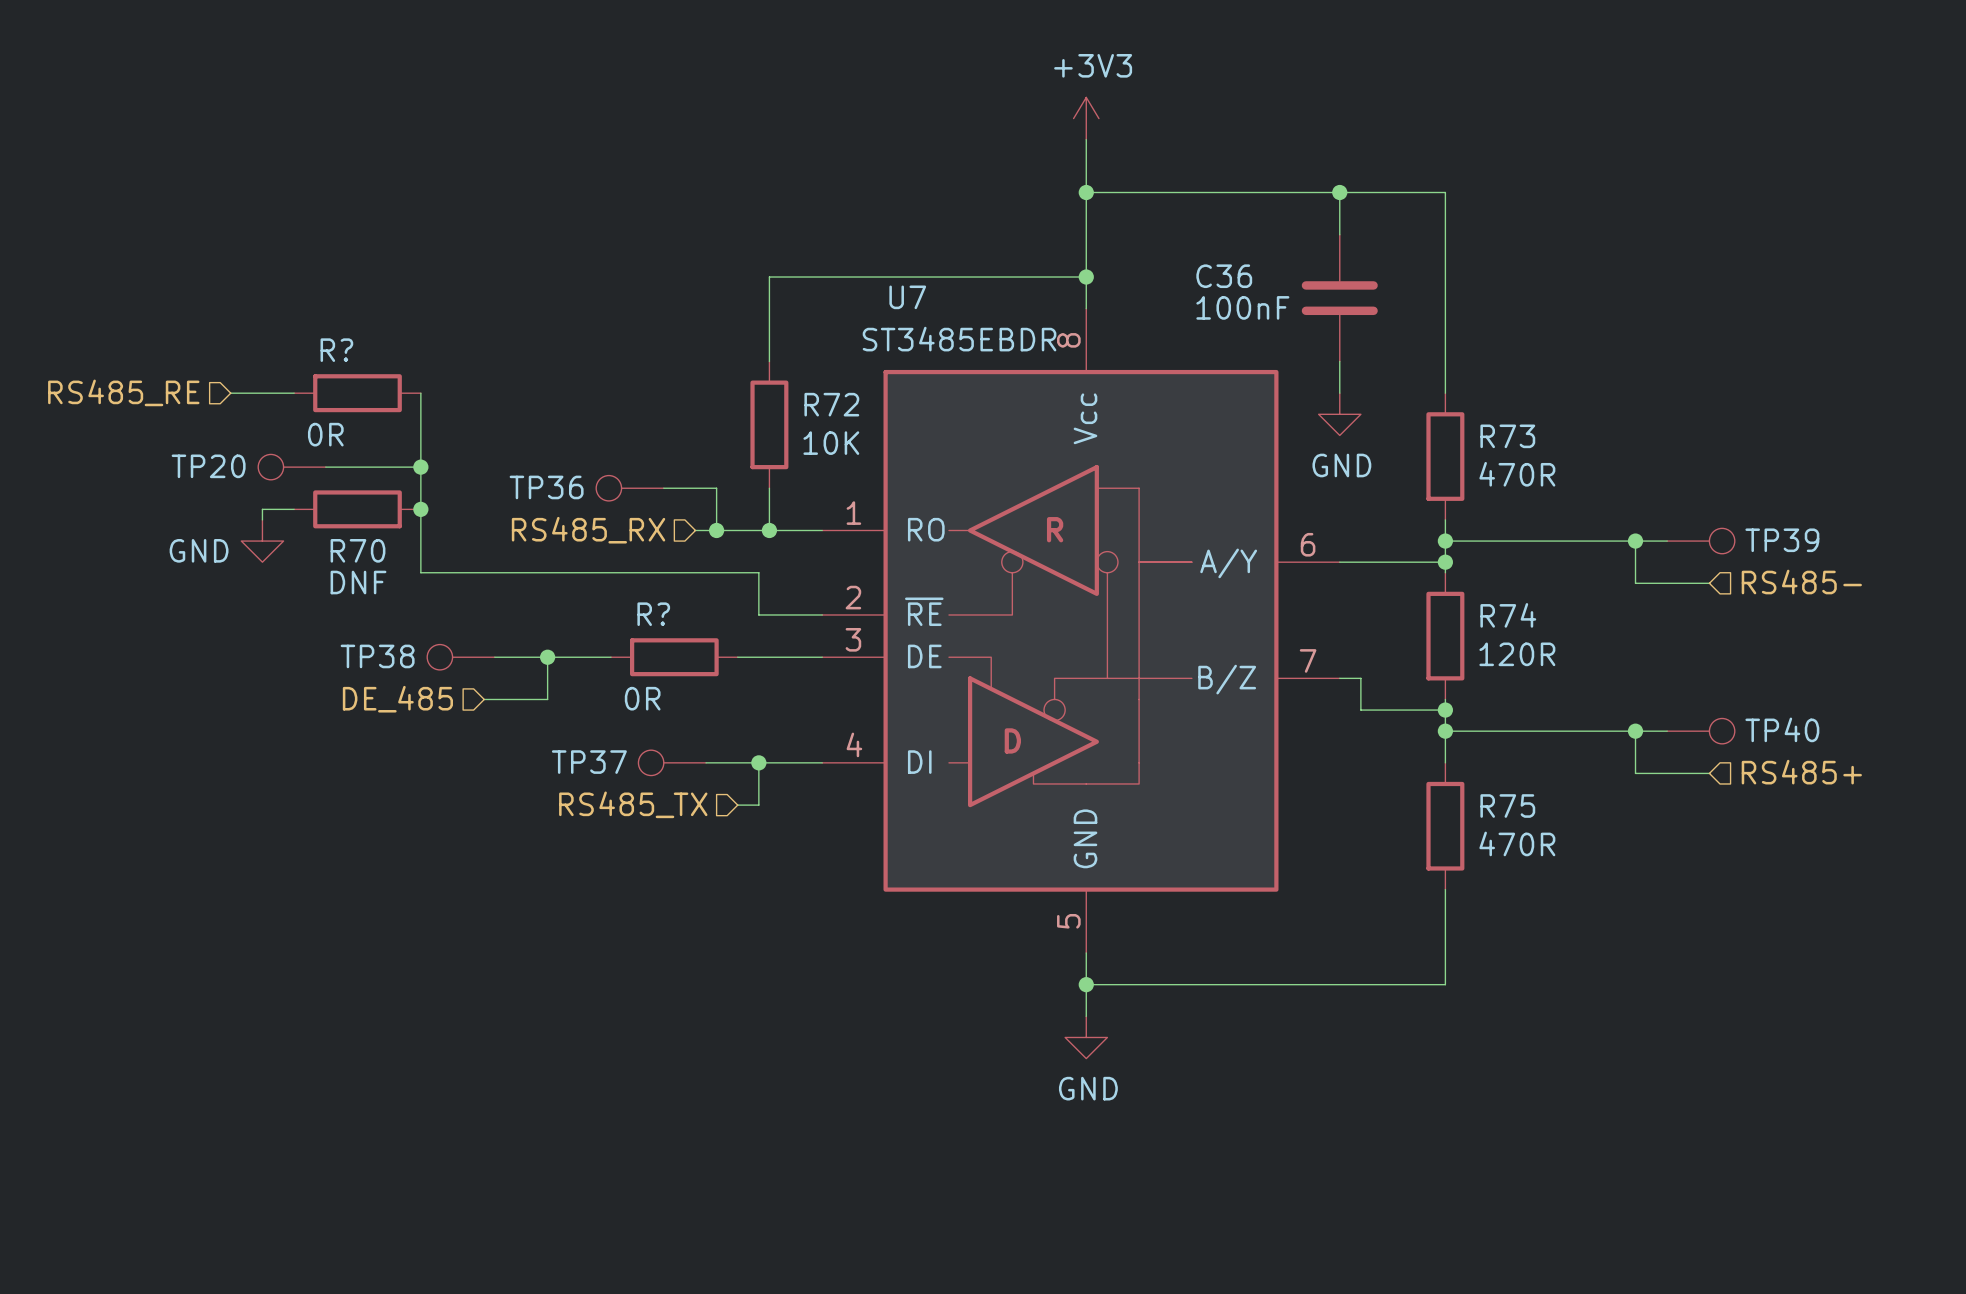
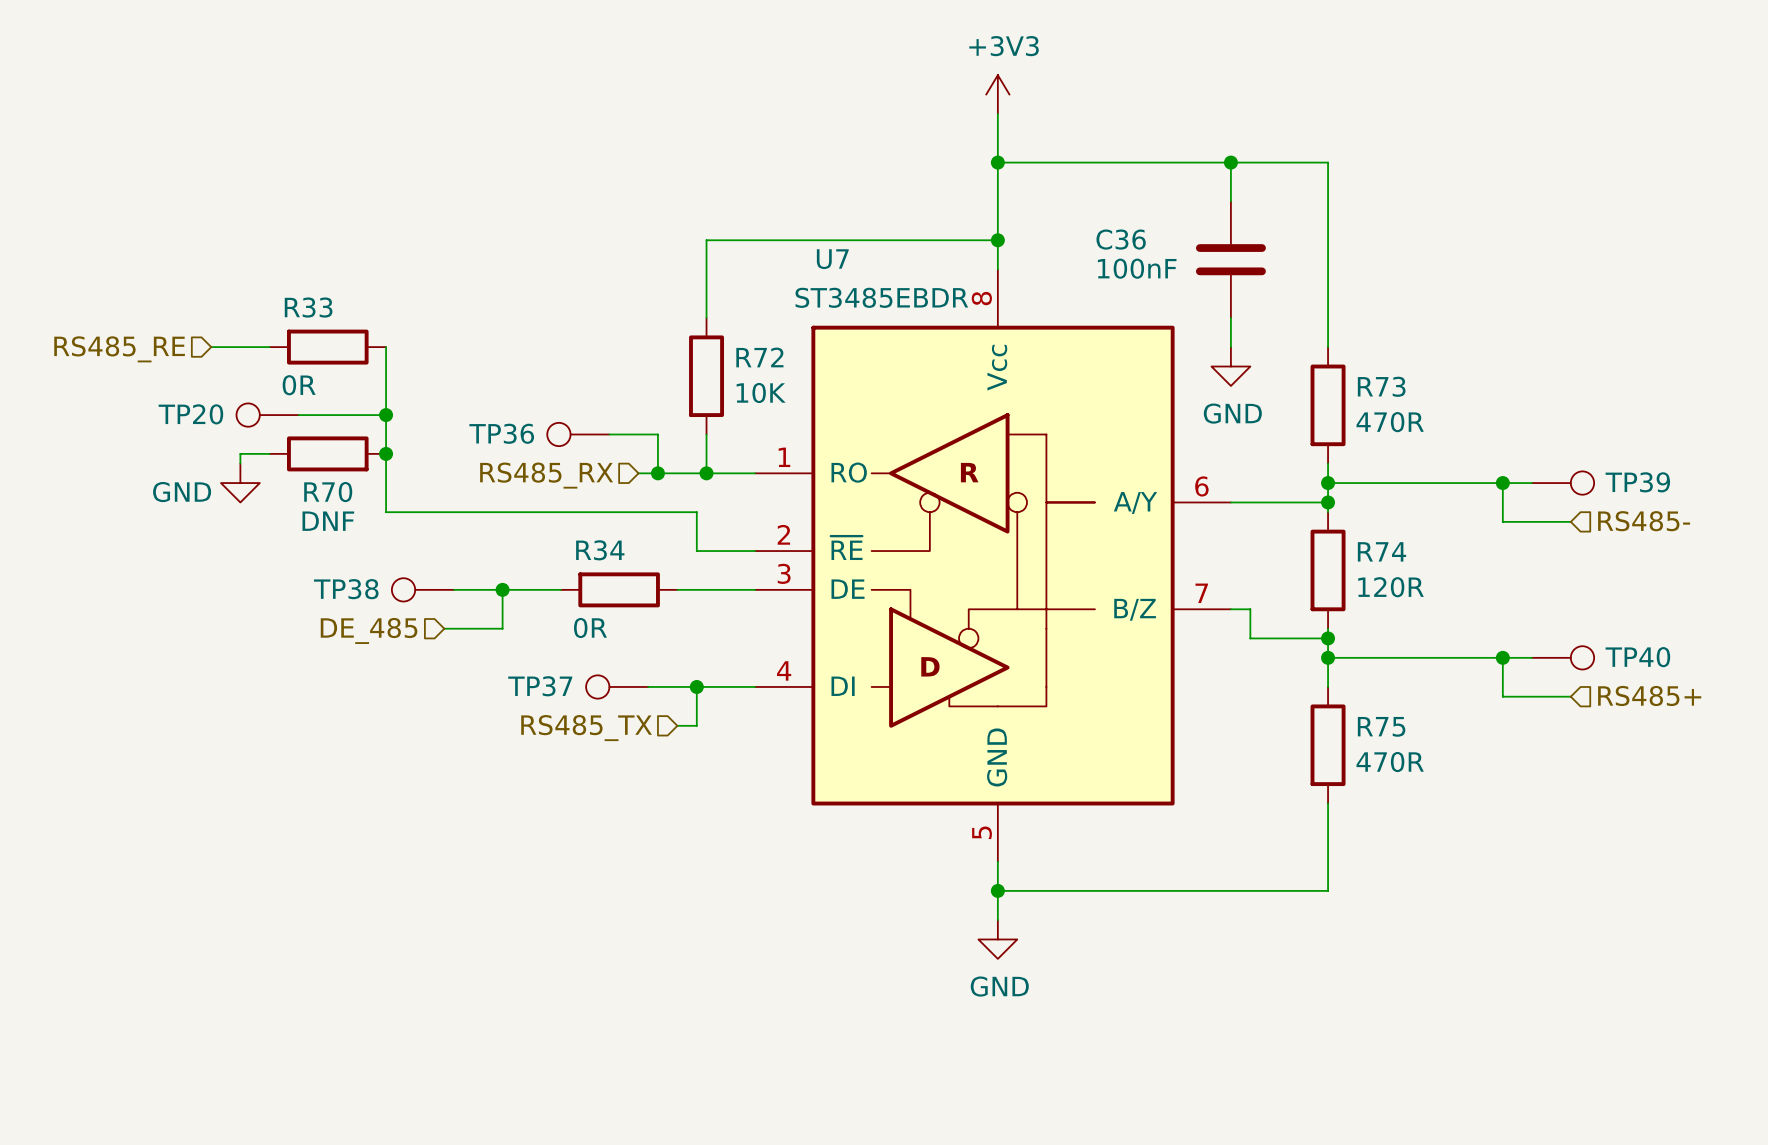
R? name: R? (336, 350) -> R33 (308, 307)
R? name: R? (653, 614) -> R34 (600, 550)

